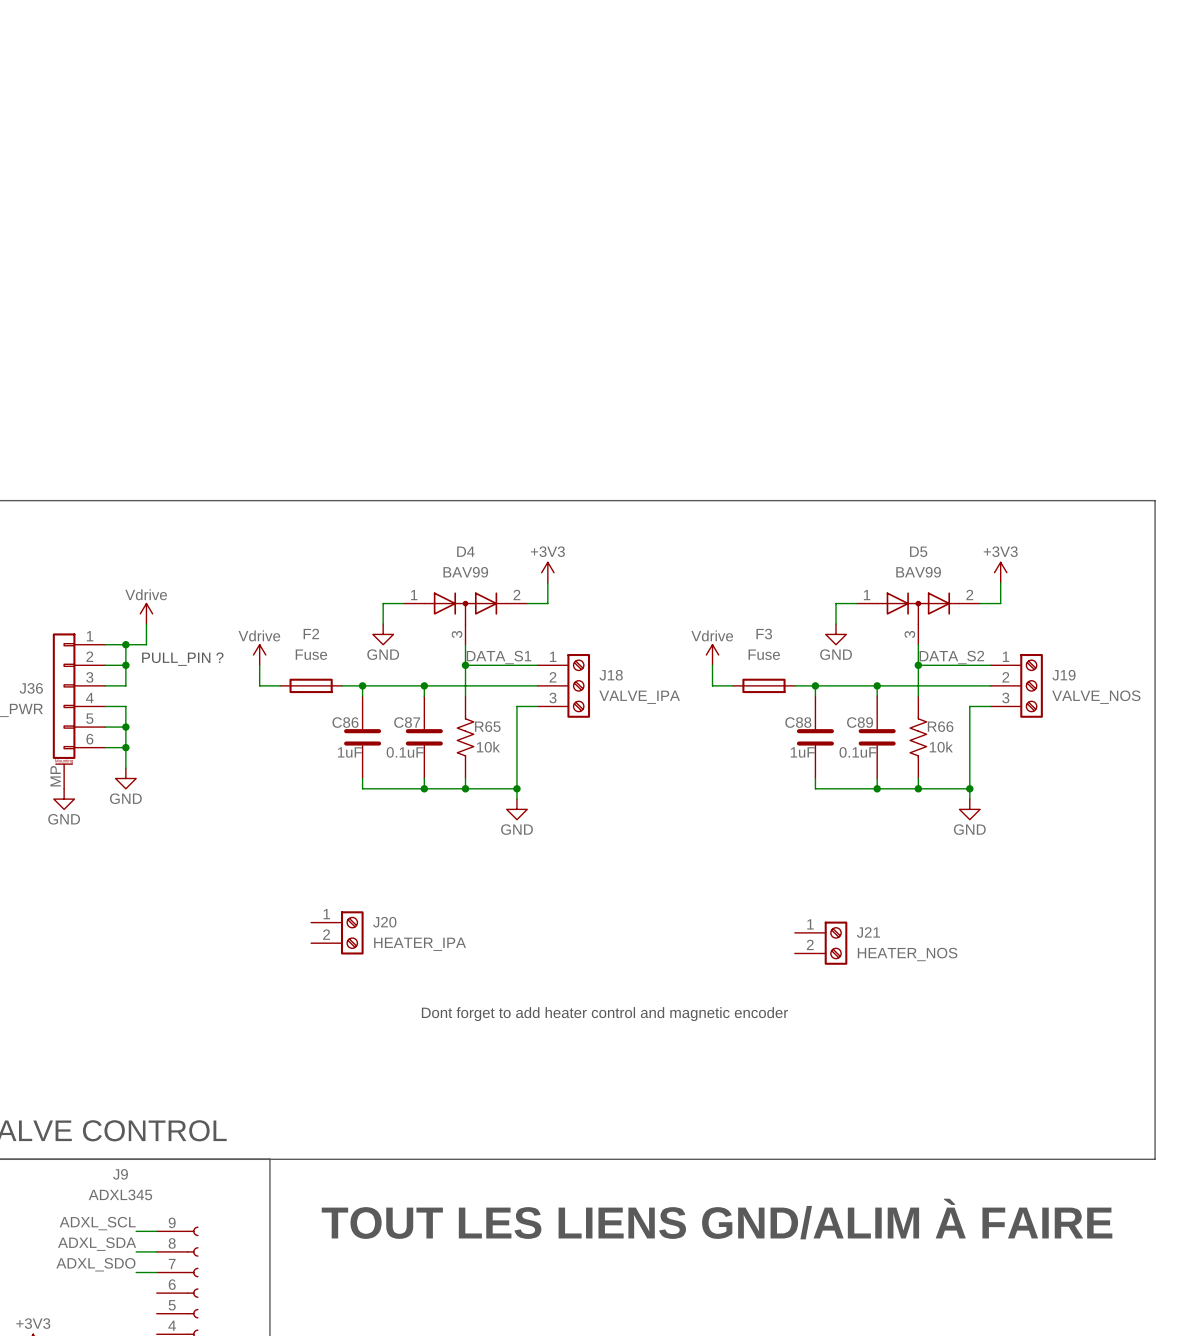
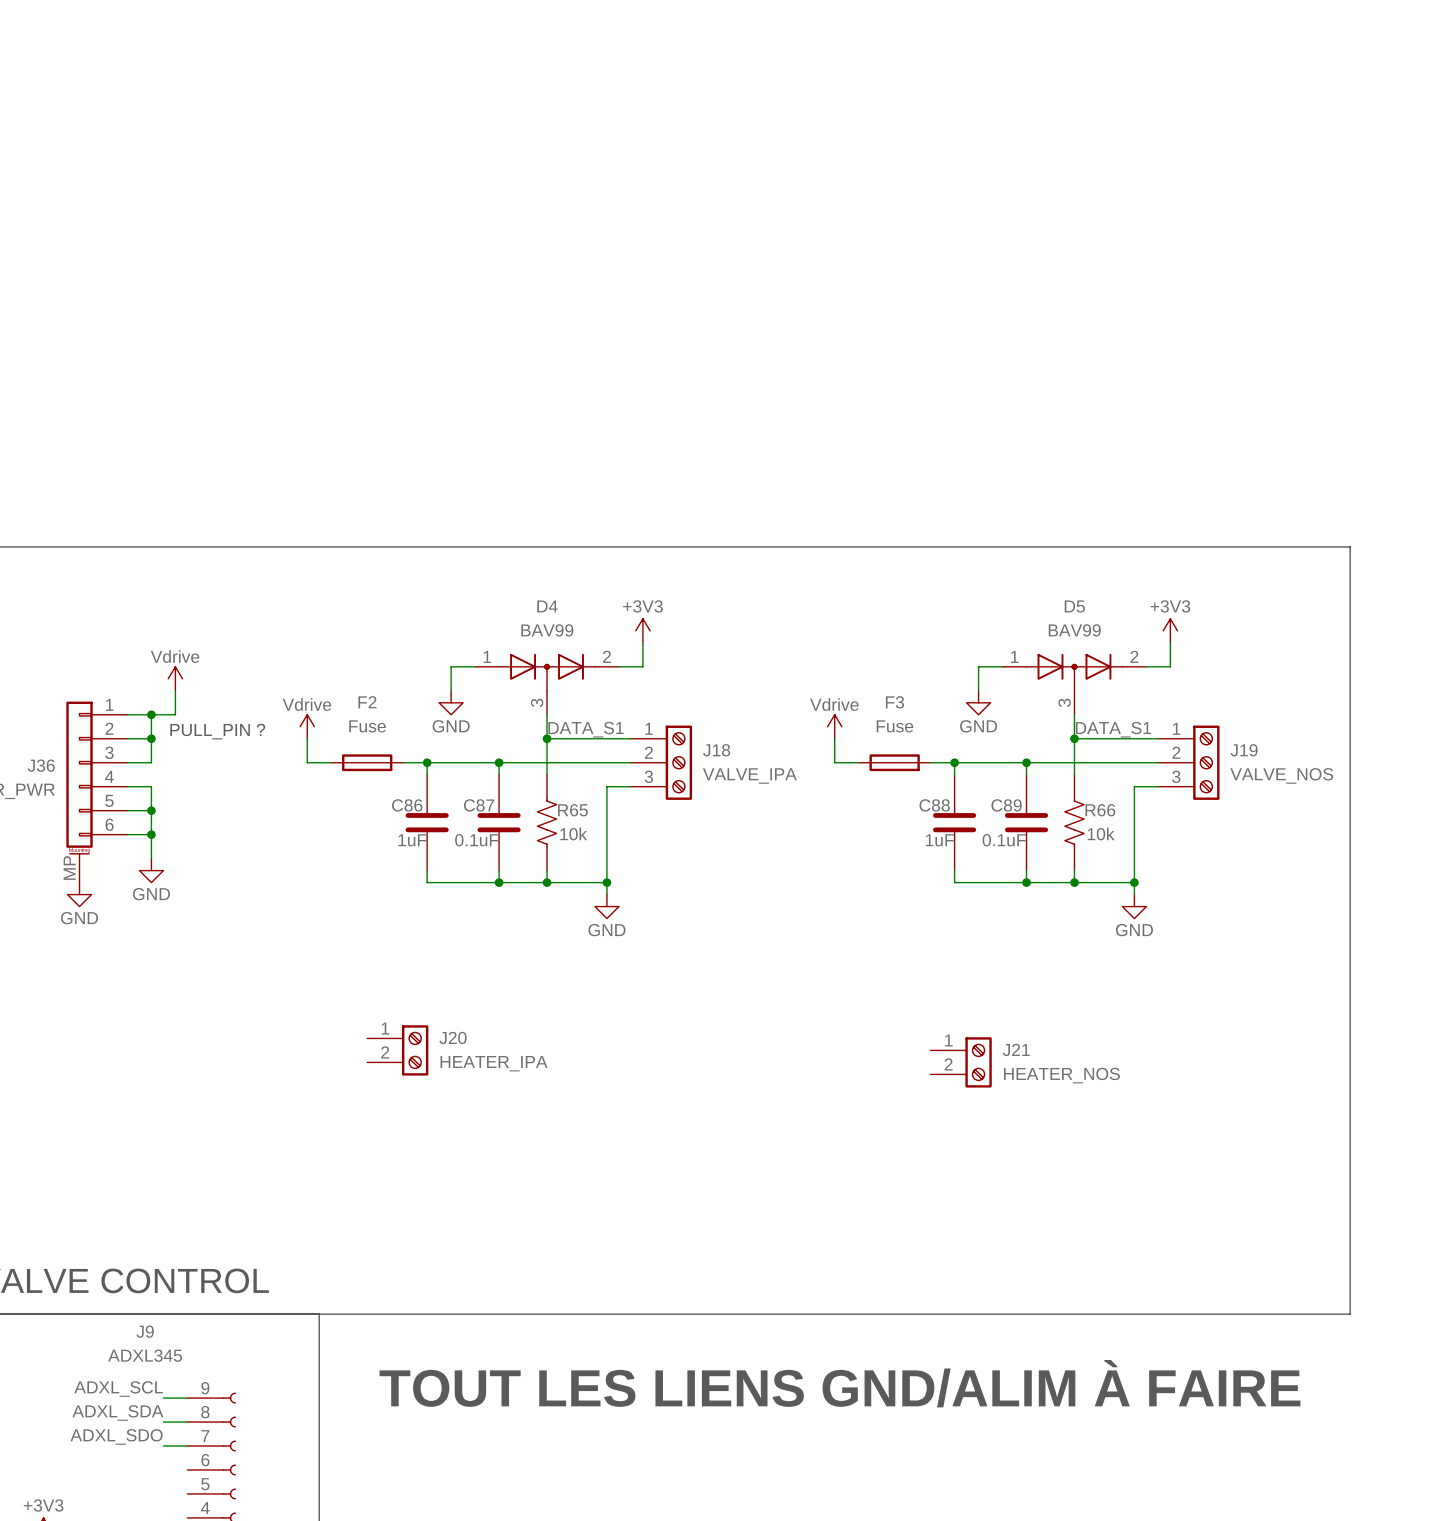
label: DATA_S2 (951, 657) -> DATA_S1 (1113, 729)
text: Dont forget to add heater control and magnetic encoder (604, 1014) -> none

